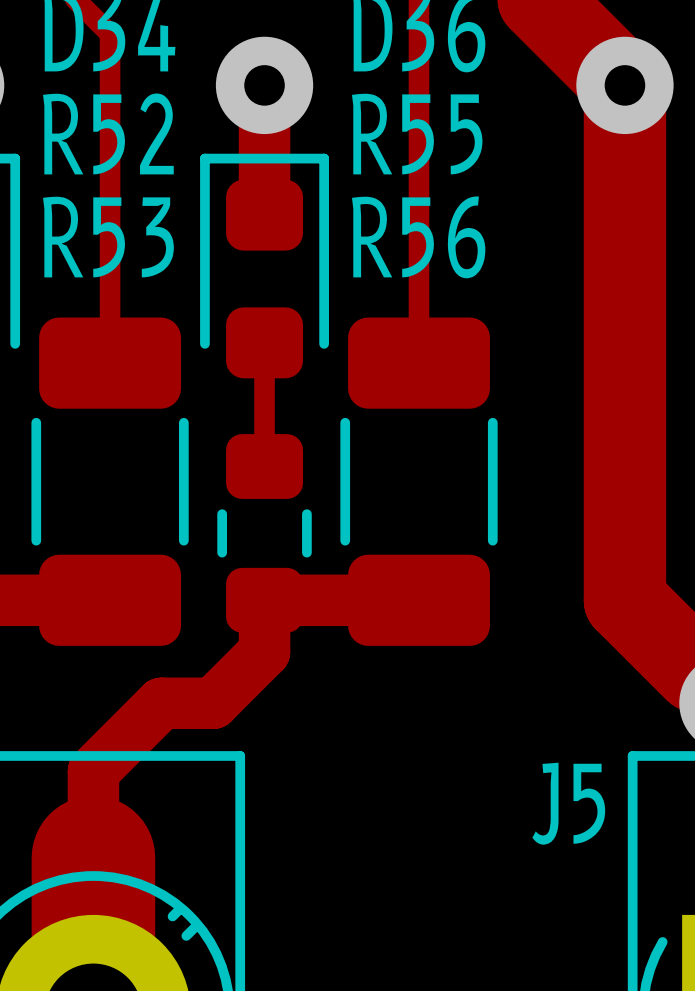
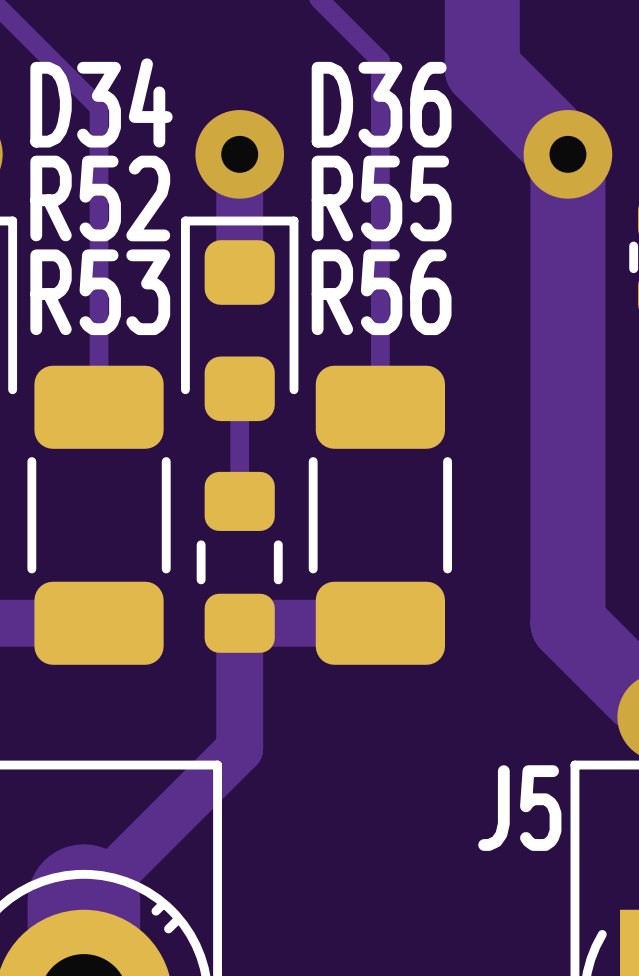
track: (264, 651) (213, 703) (161, 703) (93, 771) (93, 904) -> (239, 670) (239, 748) (83, 904)

